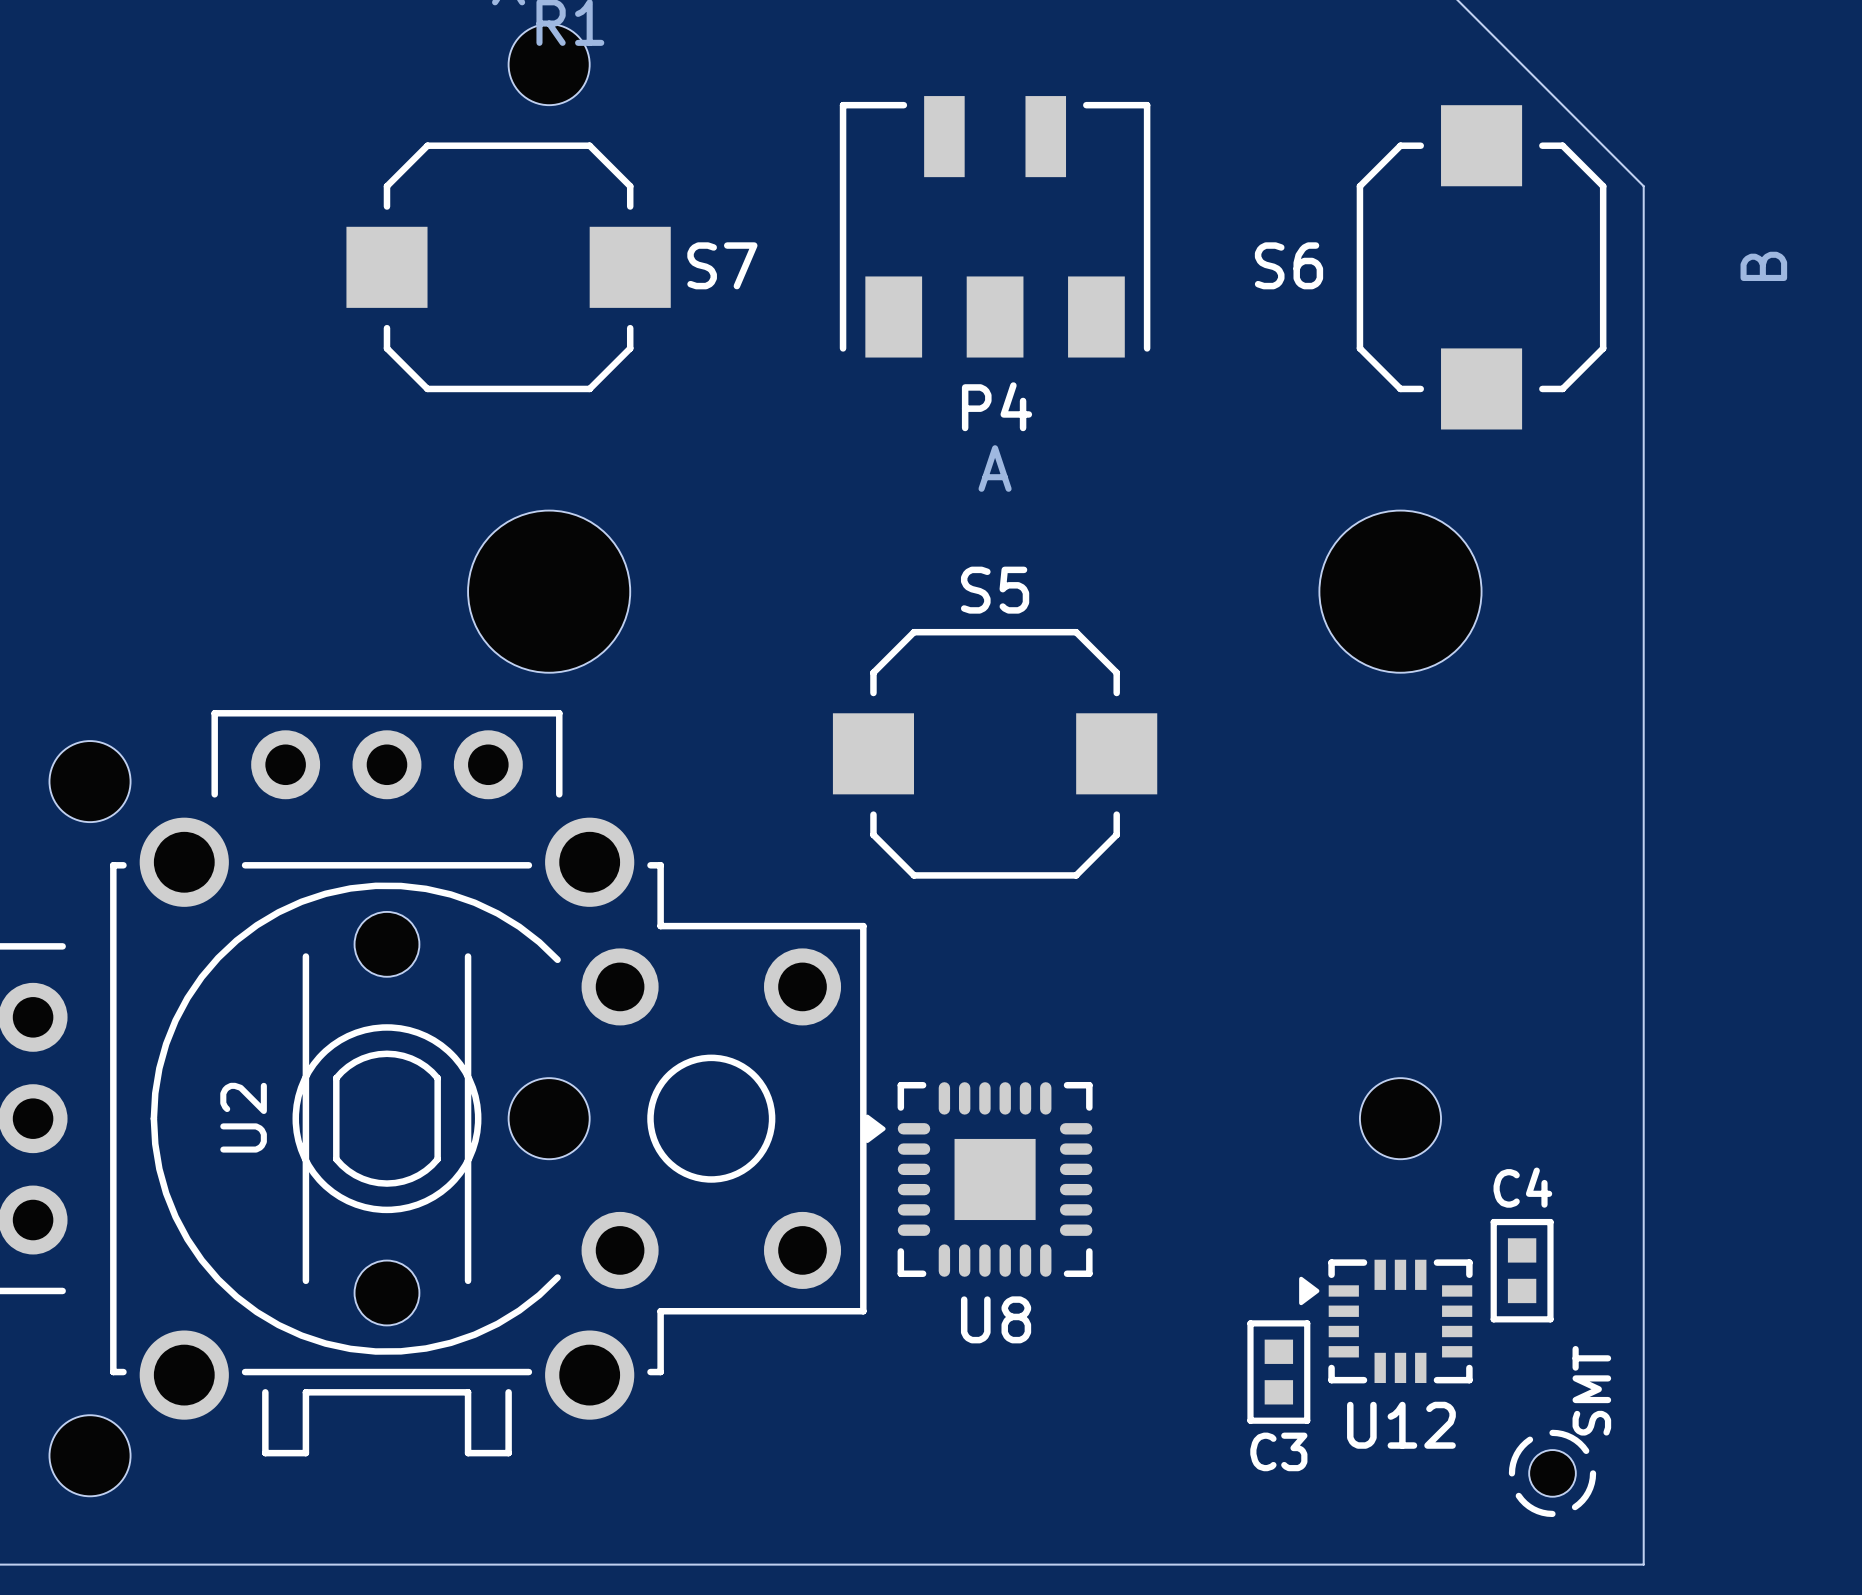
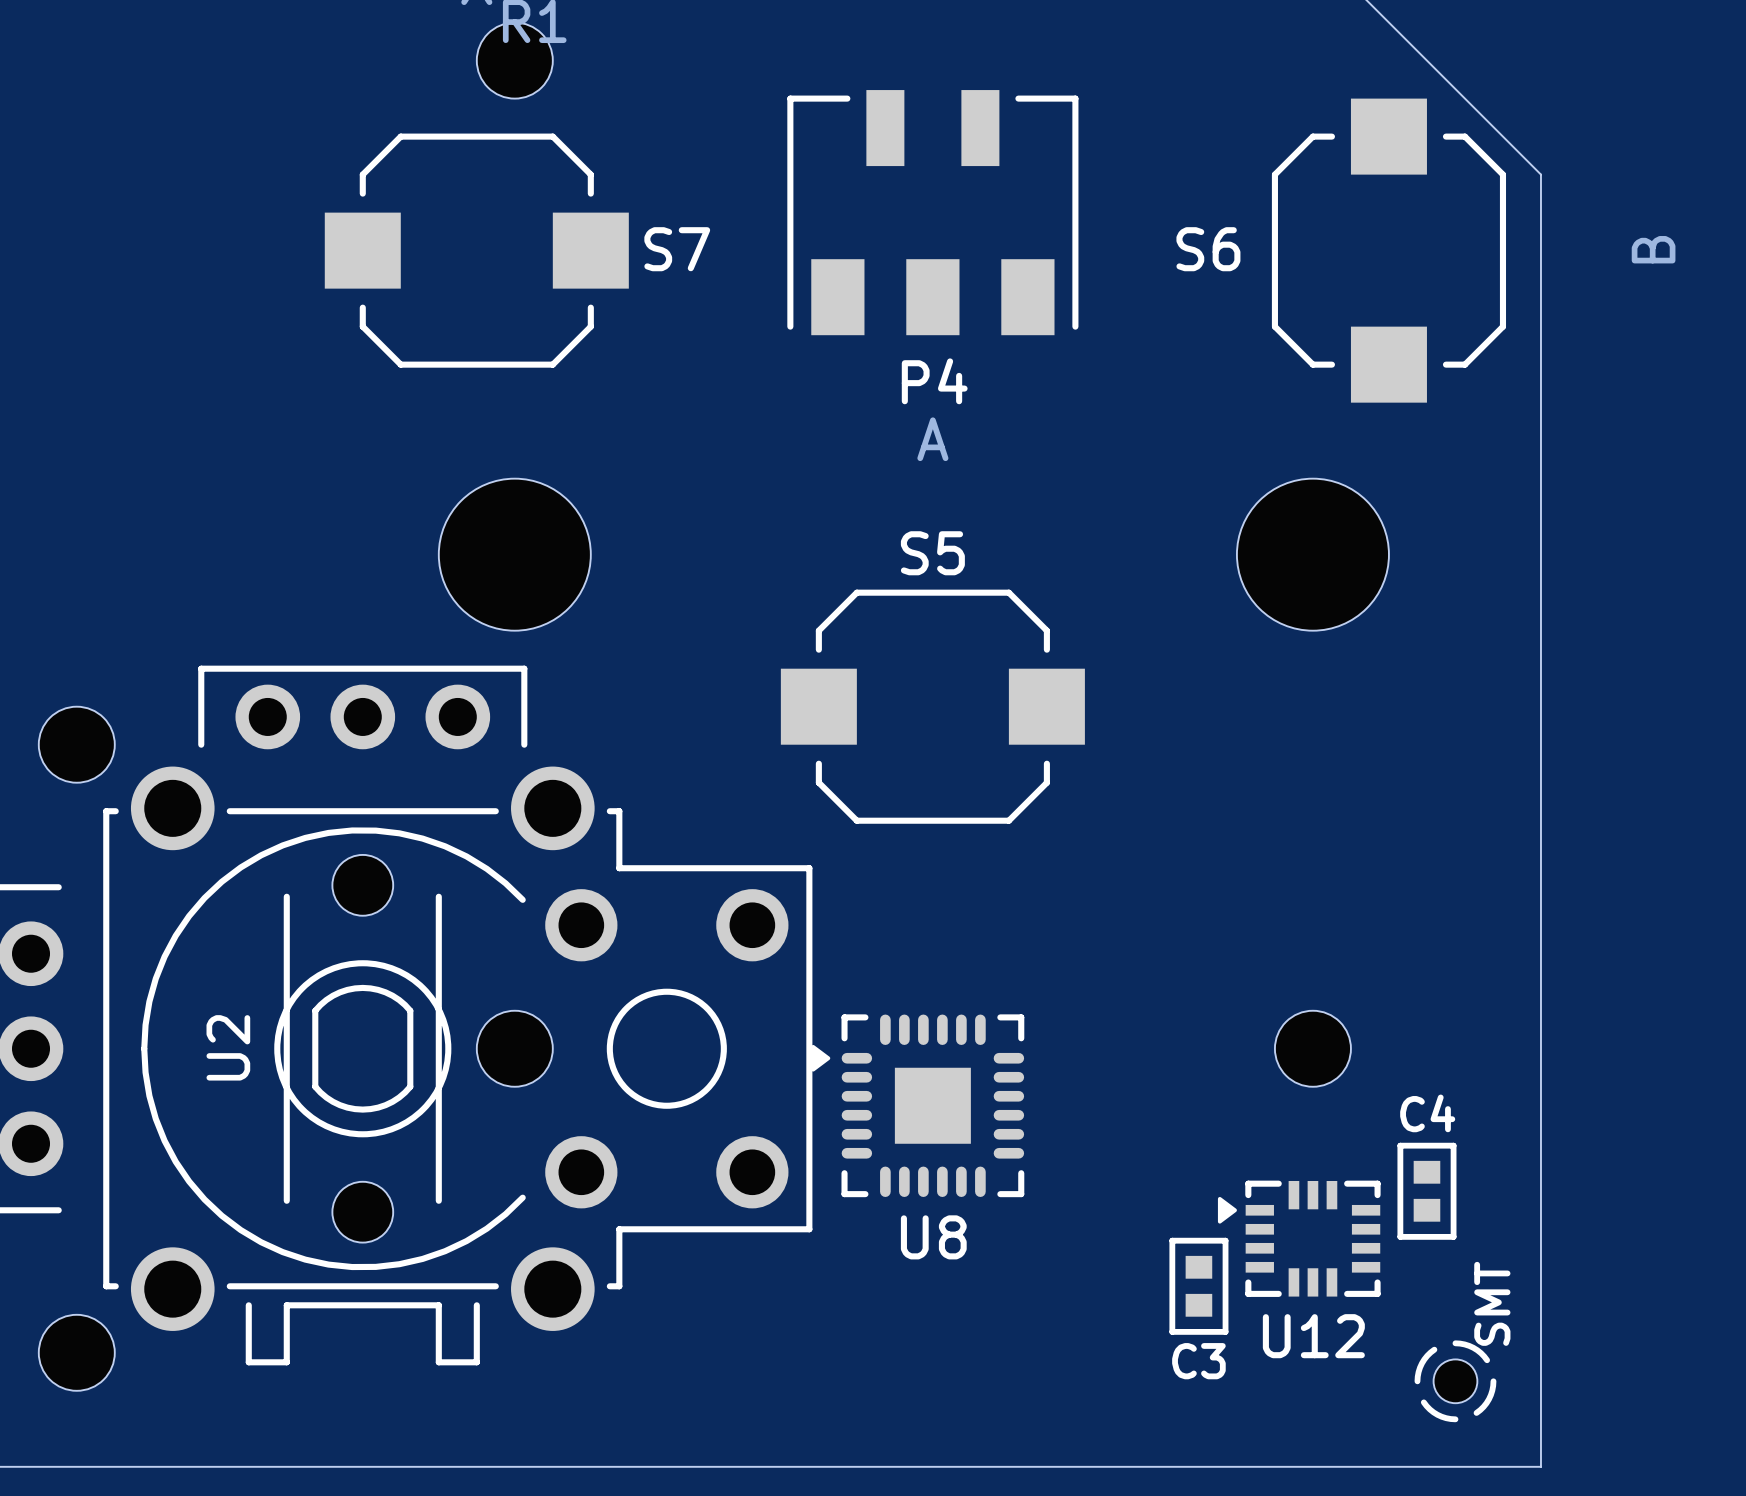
part position: (90, 781) -> (76, 744)
part position: (90, 1455) -> (76, 1352)

